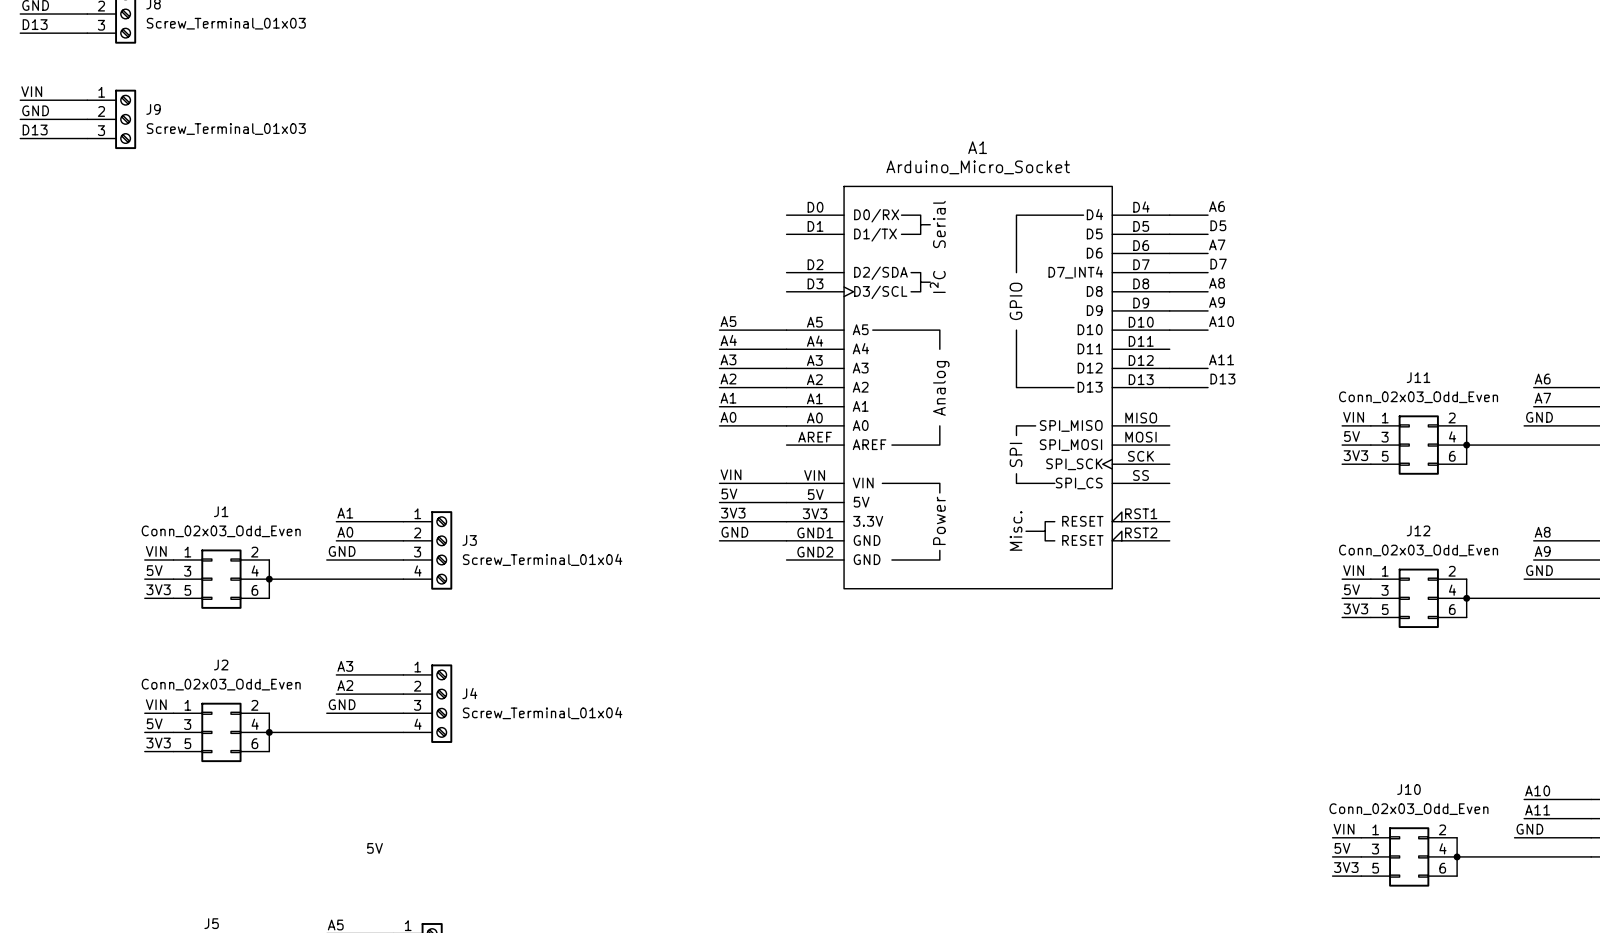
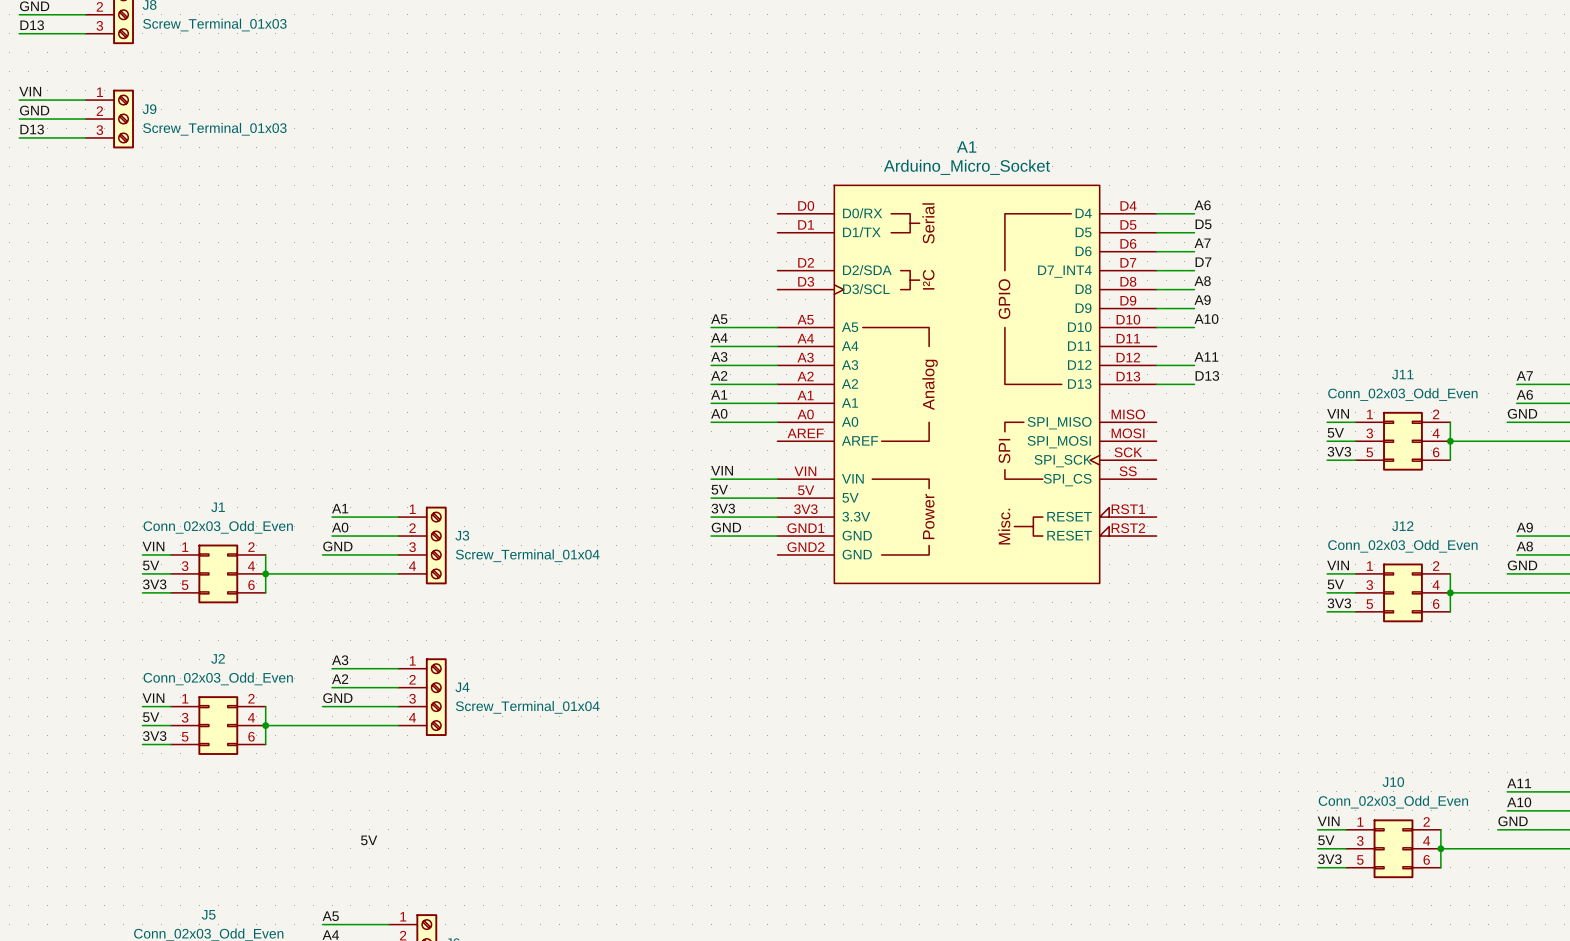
label: A6 (1542, 379) -> A7 (1524, 375)
label: A7 (1542, 398) -> A6 (1524, 394)
label: A8 (1542, 532) -> A9 (1524, 527)
label: A9 (1542, 551) -> A8 (1524, 546)
label: A10 (1537, 790) -> A11 (1519, 783)
label: A11 (1537, 810) -> A10 (1519, 802)

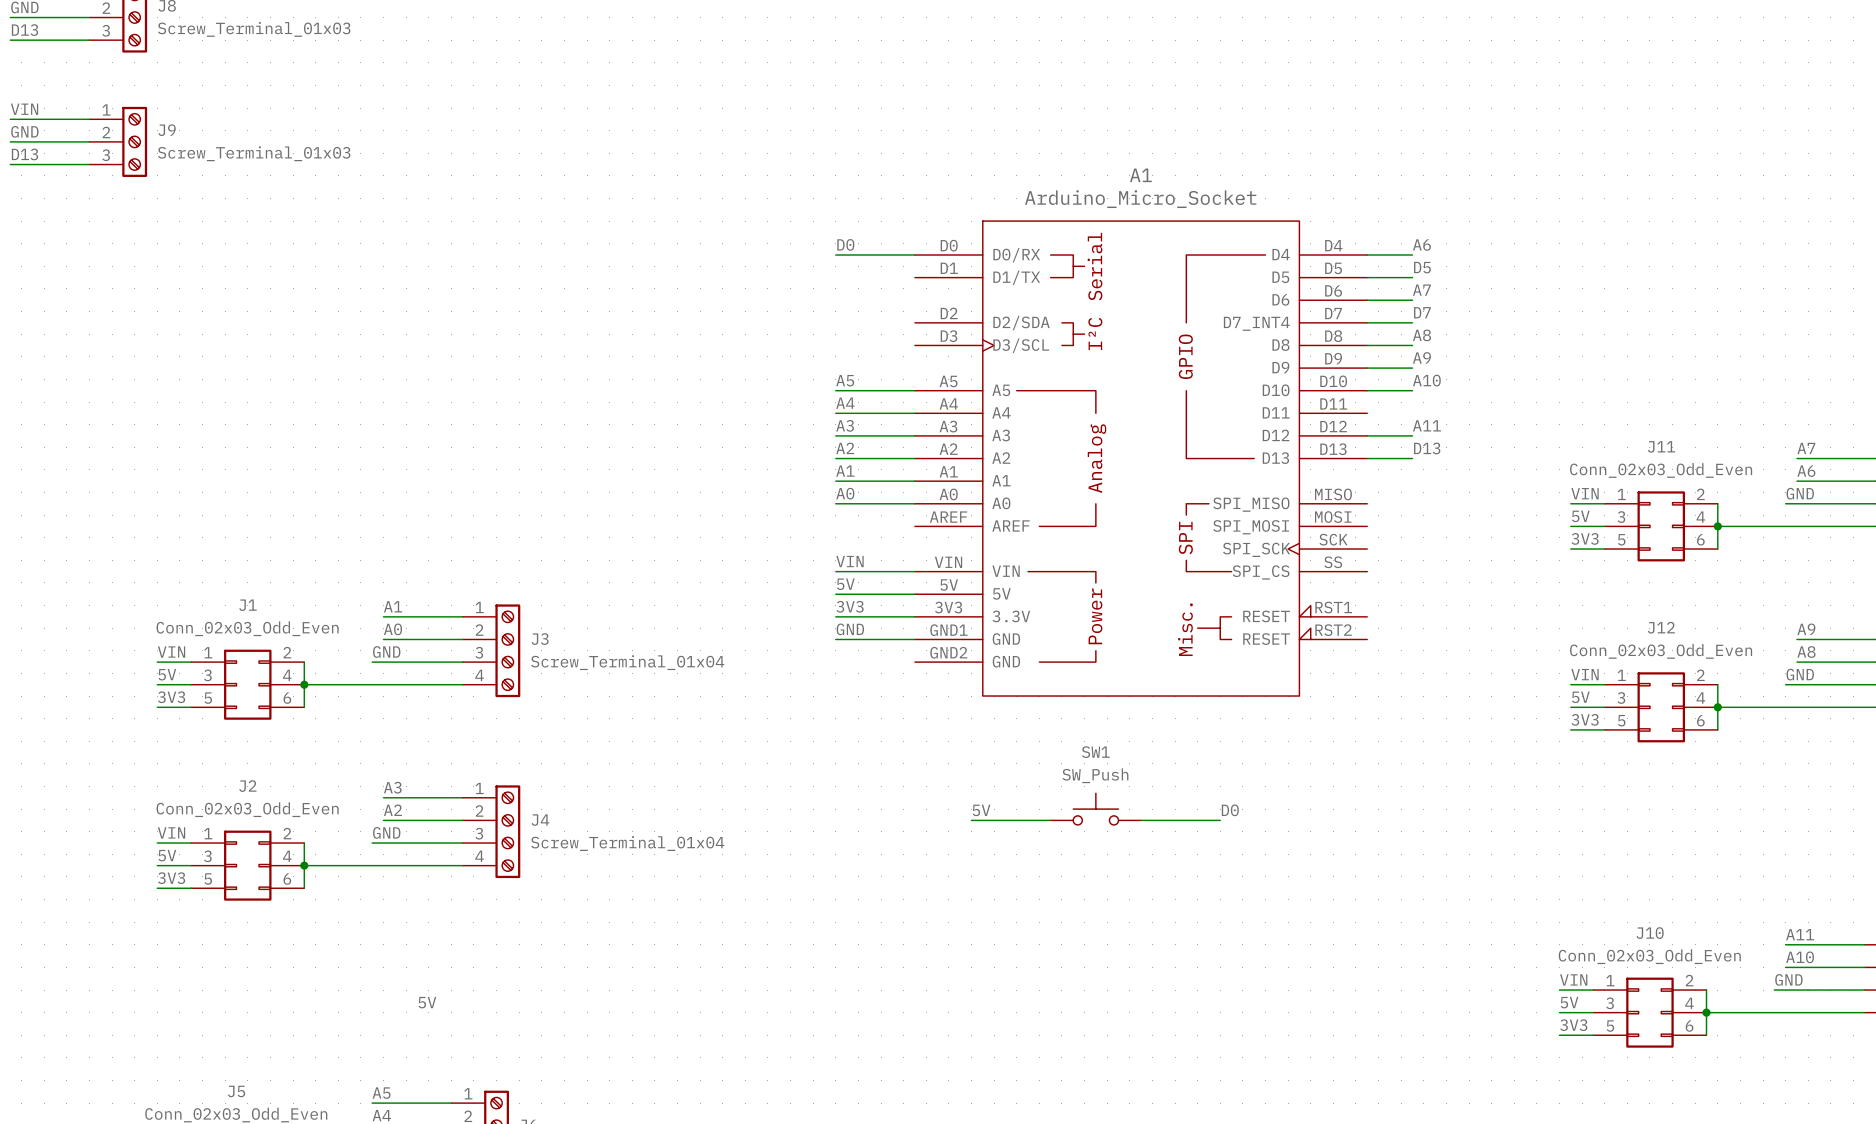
label: none -> D0 (845, 244)
wire: none -> (835, 255) (914, 255)
SW1: none -> SW_Push (1095, 809)
label: none -> 5V (981, 810)
label: none -> D0 (1230, 810)
wire: none -> (971, 820) (1050, 820)
wire: none -> (1141, 820) (1220, 820)

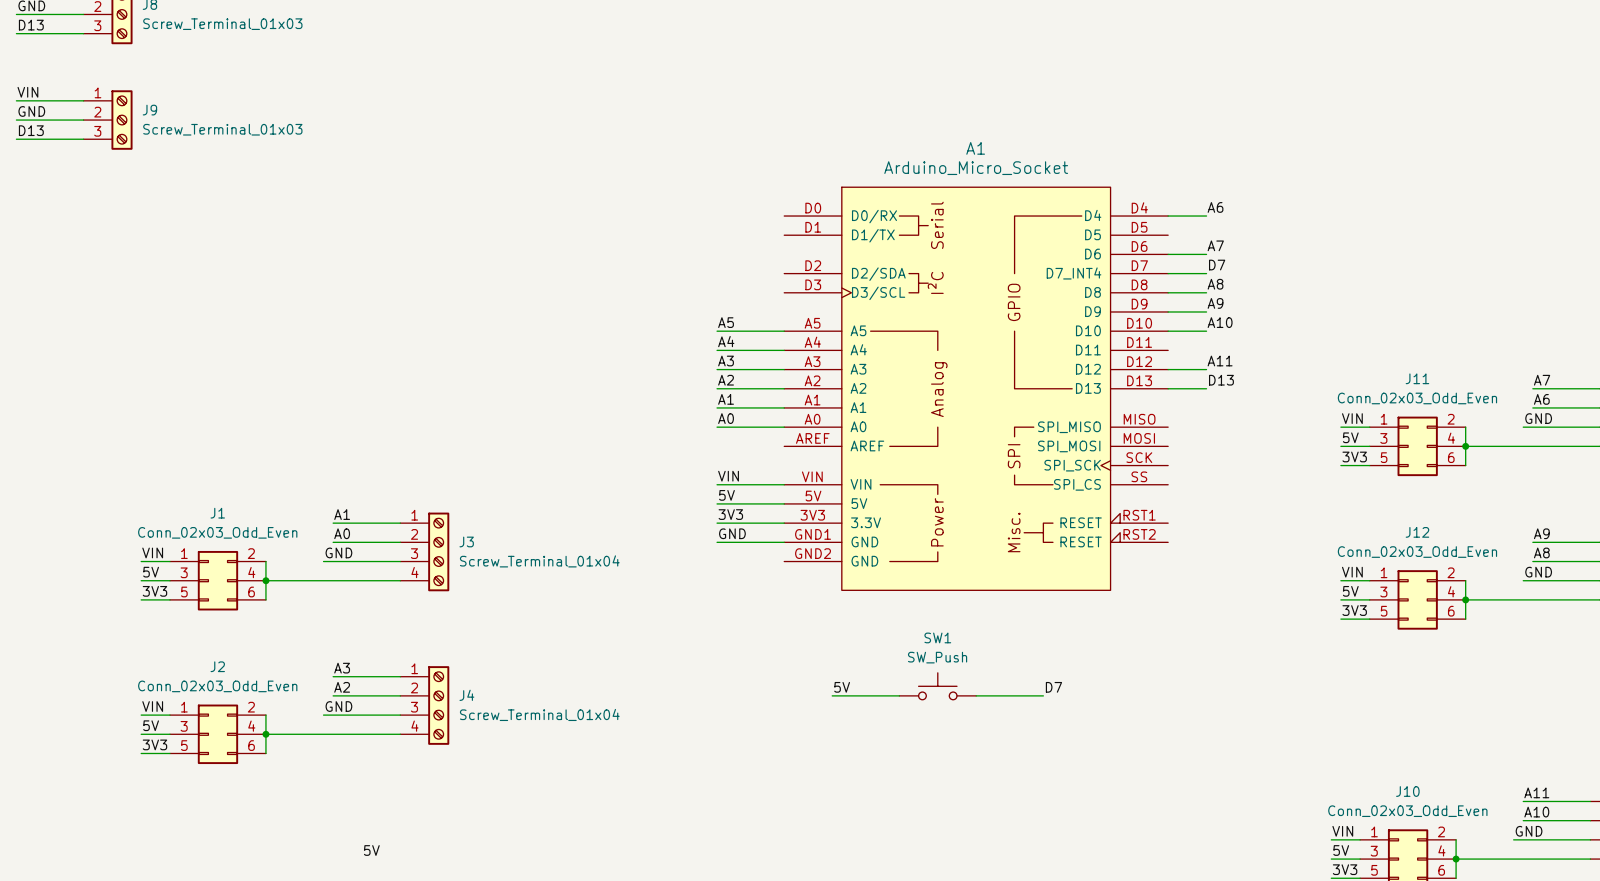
label: D0 (845, 244) -> none
wire: (835, 255) (914, 255) -> none
label: D5 (1422, 267) -> none
wire: (1367, 277) (1412, 277) -> none
label: D0 (1230, 810) -> D7 (1053, 687)

